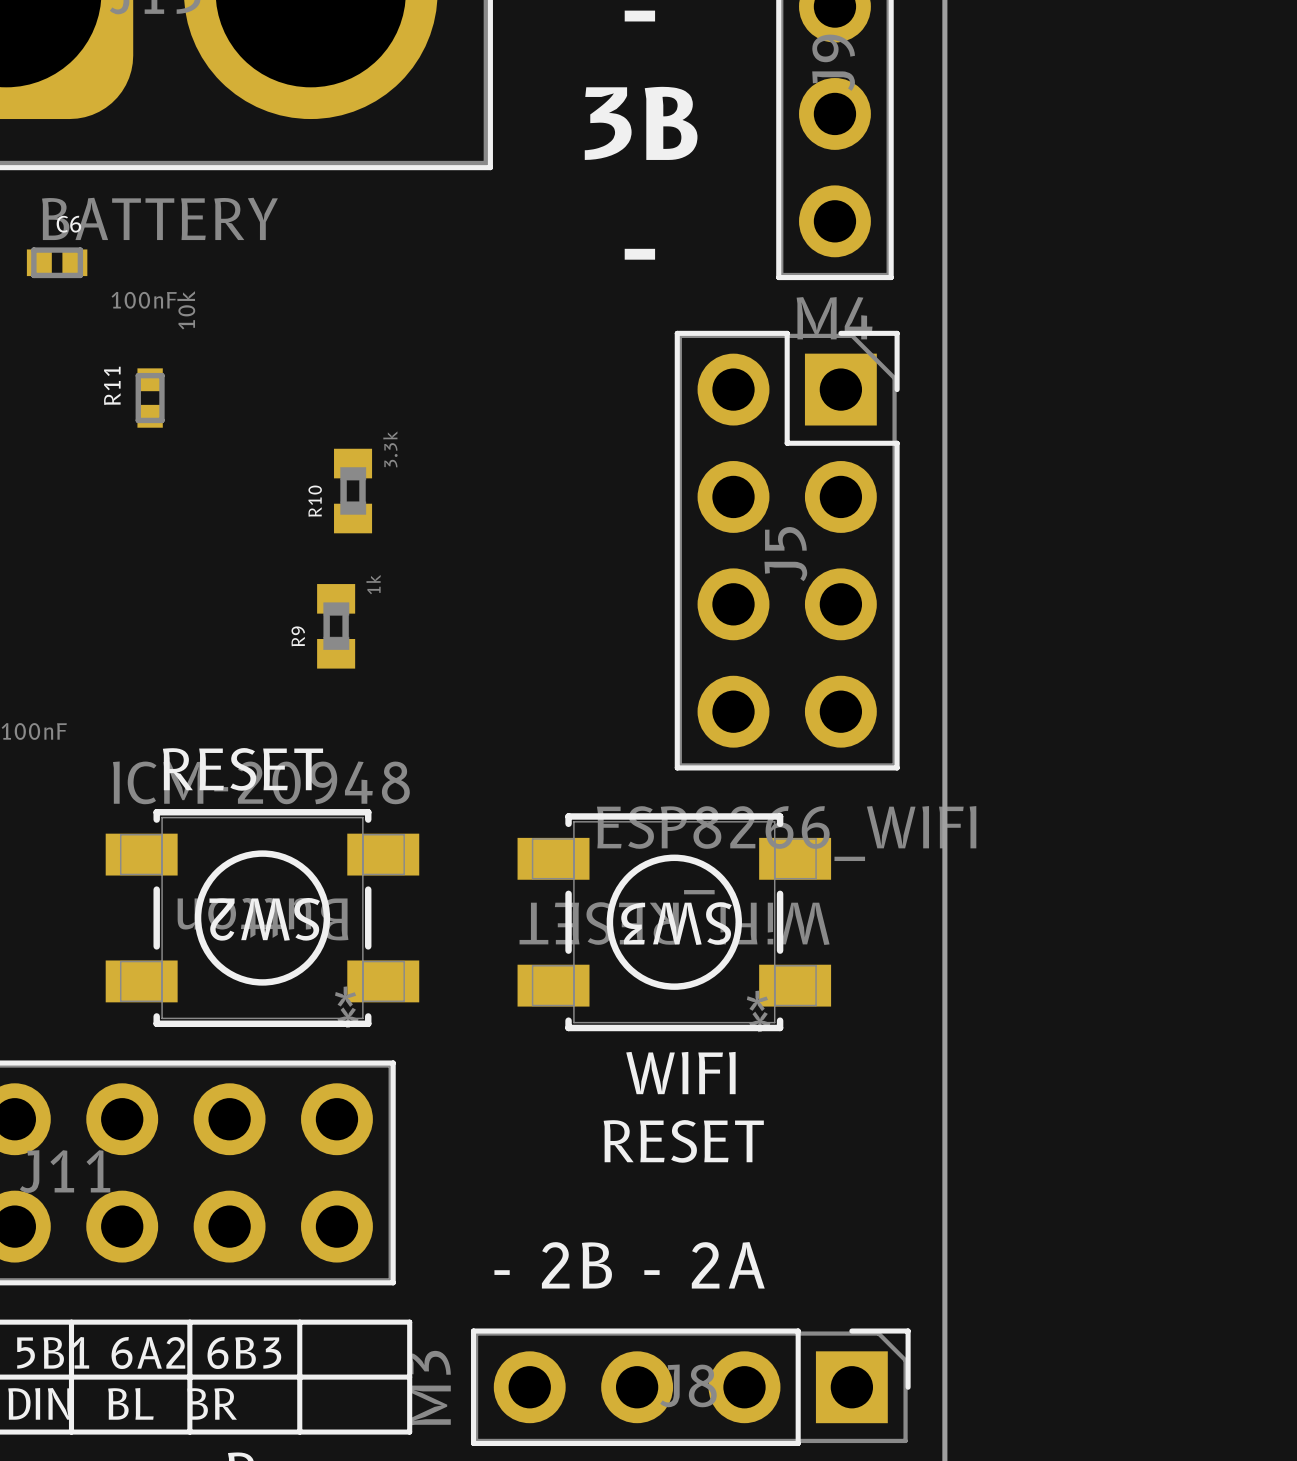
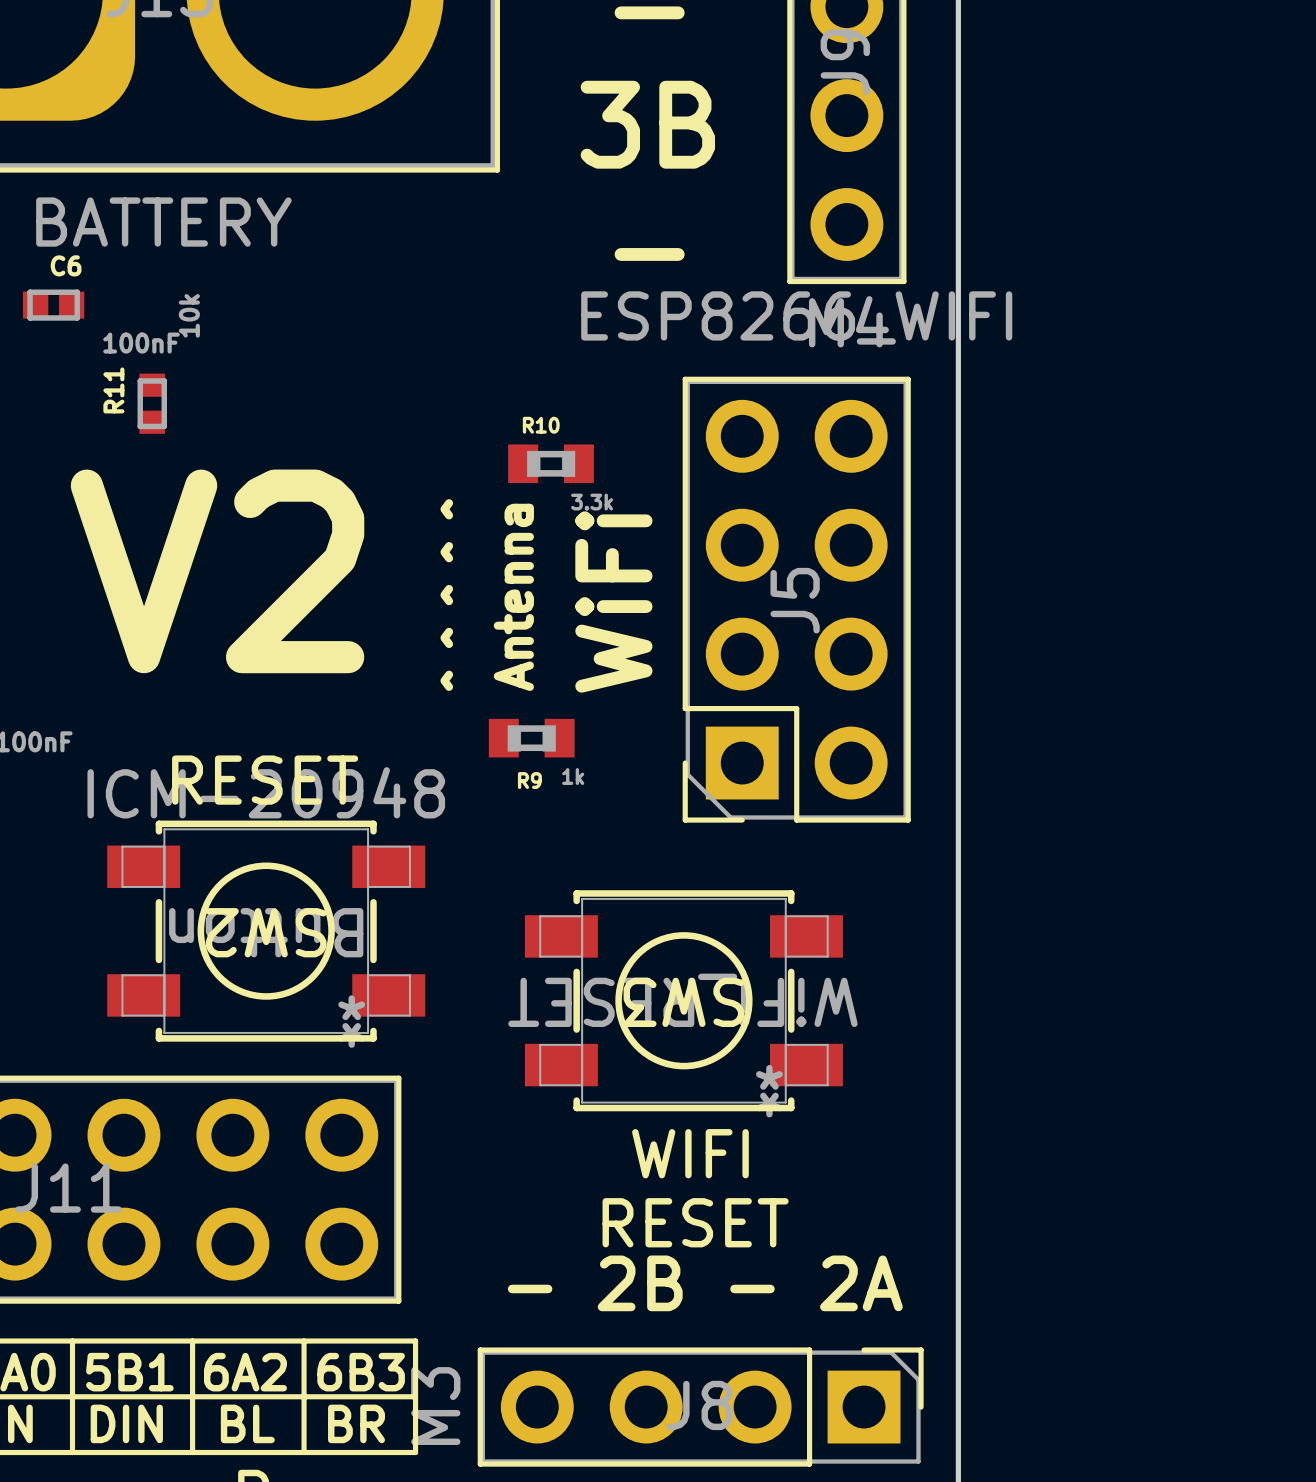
C6 position: (57, 262) -> (53, 305)
R10 rotation: 0° (353, 491) -> 90° clockwise (551, 463)
R10 position: (353, 491) -> (551, 463)
J5 rotation: 0° (787, 550) -> 180° (796, 599)
text: none -> V2 (217, 571)
text: none -> ^ ^ ^ ^ ^ (446, 595)
text: none -> Antenna (513, 597)
text: none -> WiFi (613, 601)
R9 rotation: 0° (336, 626) -> 90° clockwise (531, 738)
R9 position: (336, 626) -> (531, 738)
SW3 position: (674, 922) -> (683, 1000)
text: WIFI (680, 1073) -> none
text: RESET (683, 1141) -> WIFI (690, 1153)
text: none -> RESET (695, 1222)

